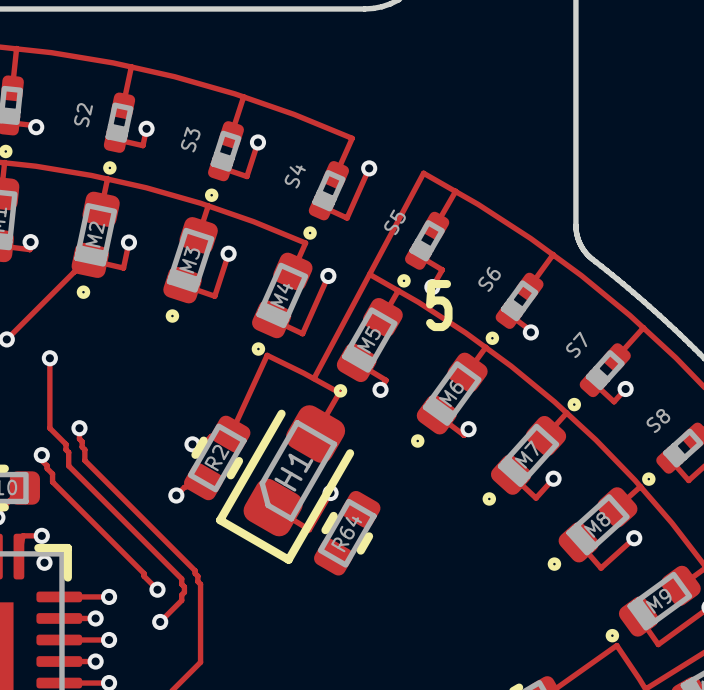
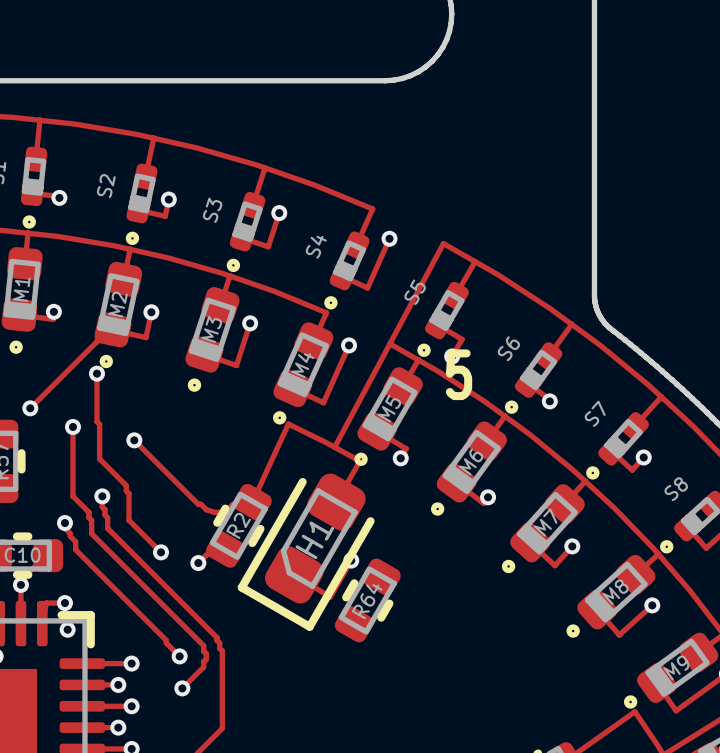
track: none -> (96, 373) (99, 459) (126, 485) (126, 491) (129, 493) (129, 520) (161, 552)
via: none -> (96, 373)
track: none -> (134, 440) (198, 504) (214, 512)
via: none -> (134, 440)
via: (192, 444) -> none
via: none -> (161, 552)

